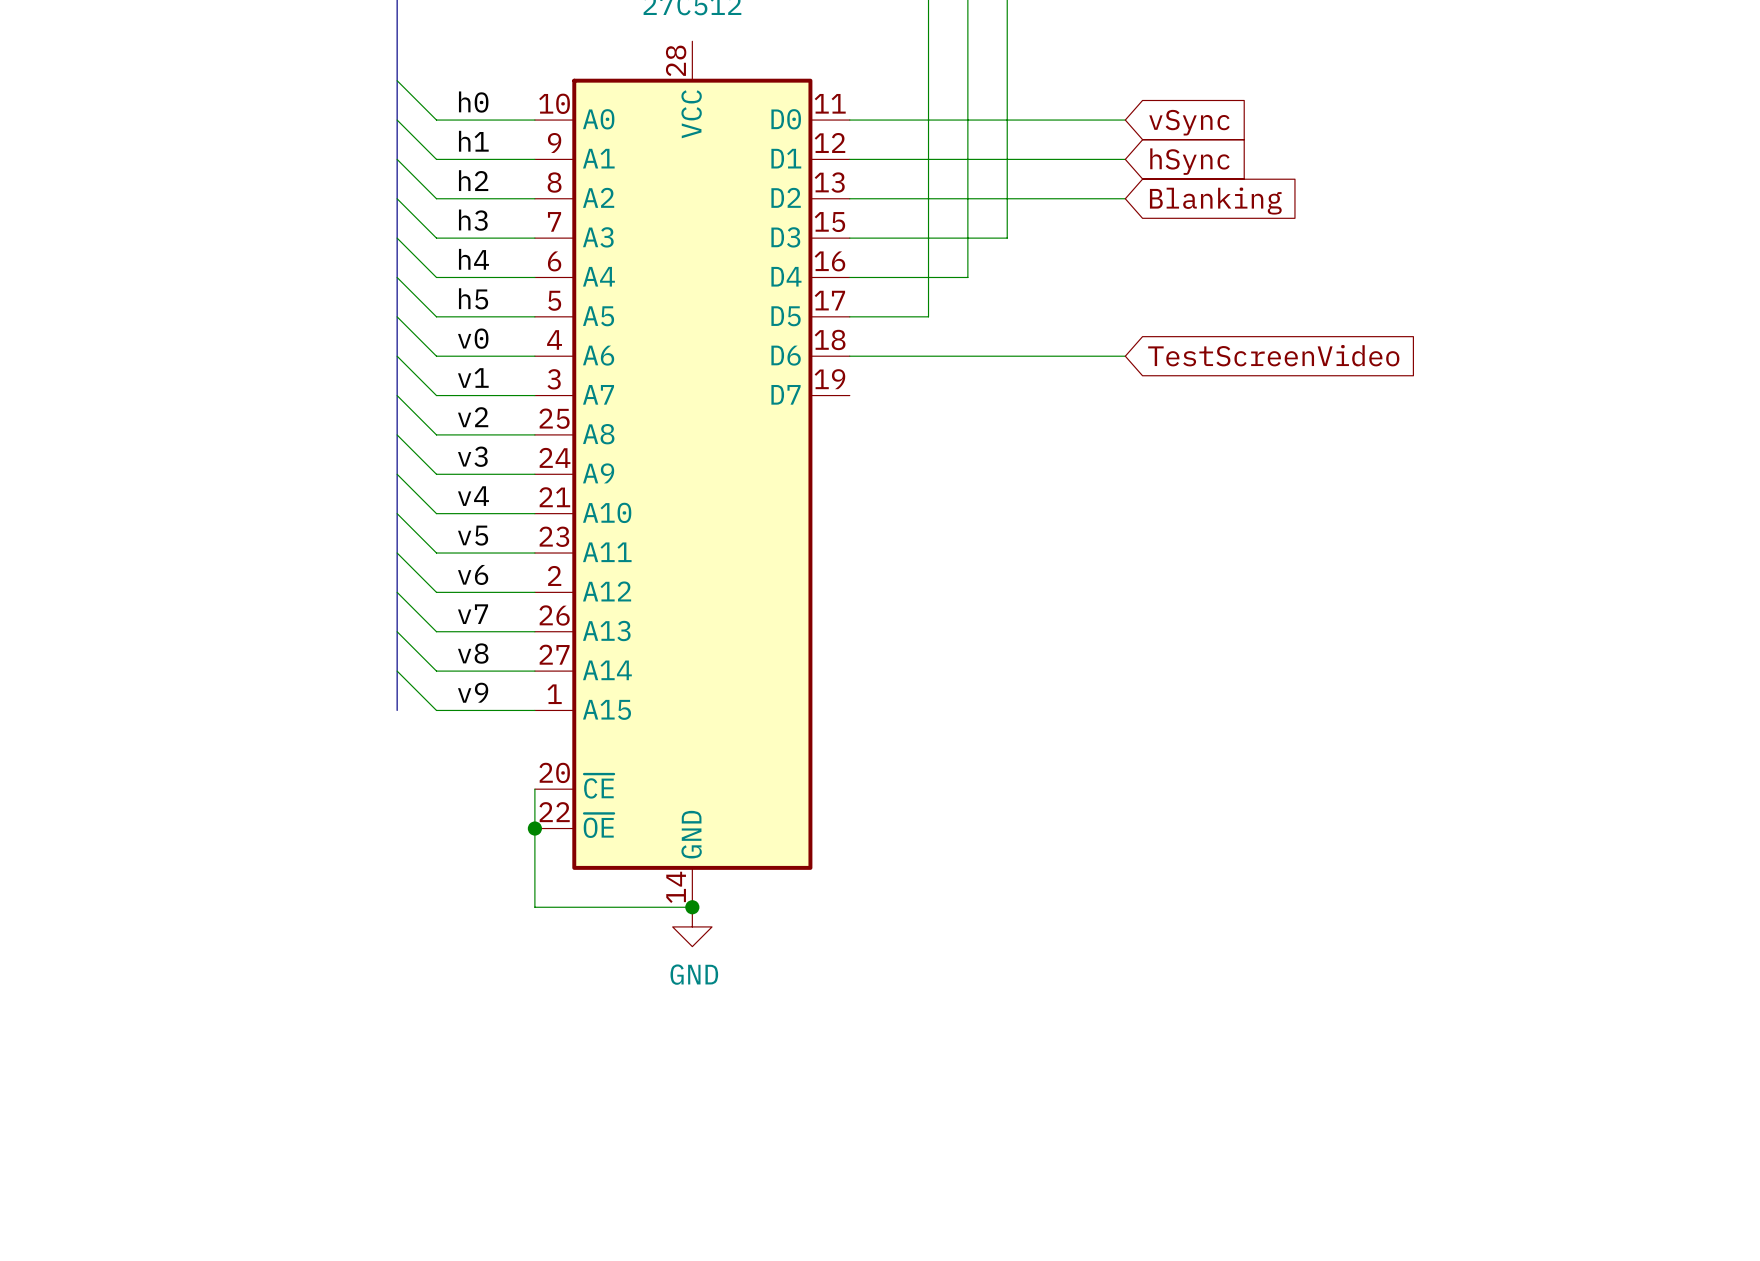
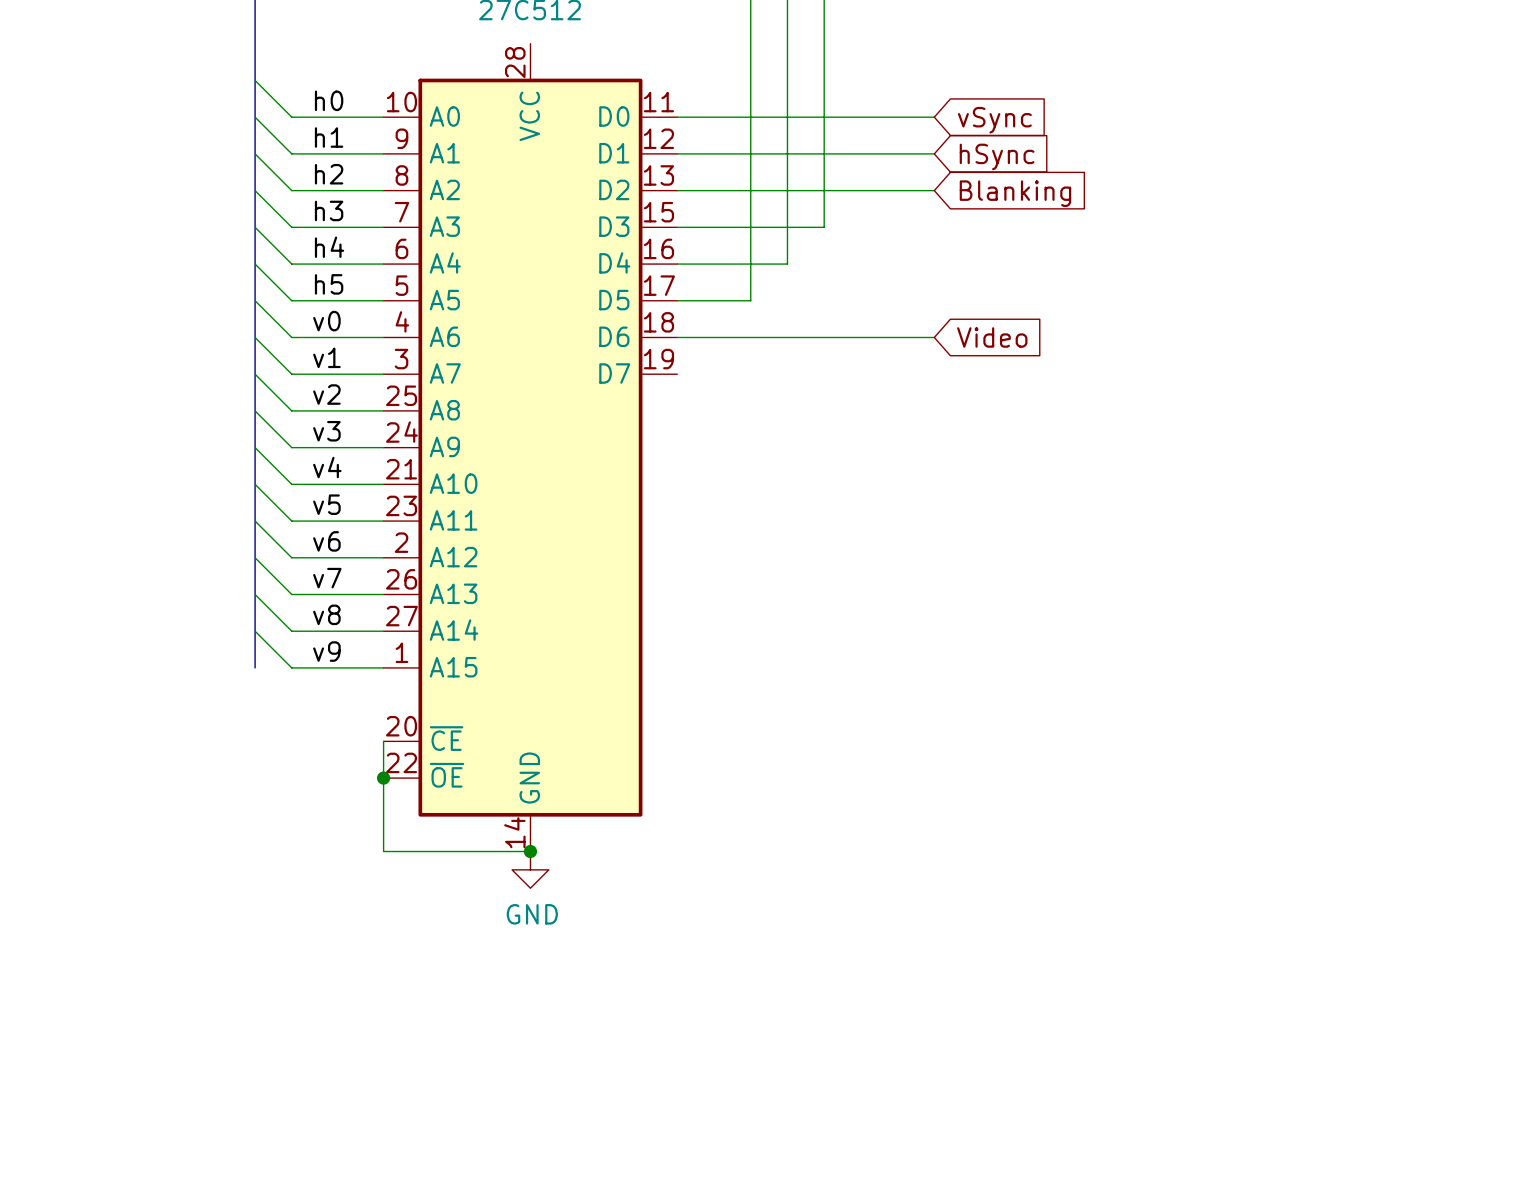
global label: TestScreenVideo (1273, 355) -> Video (992, 337)

